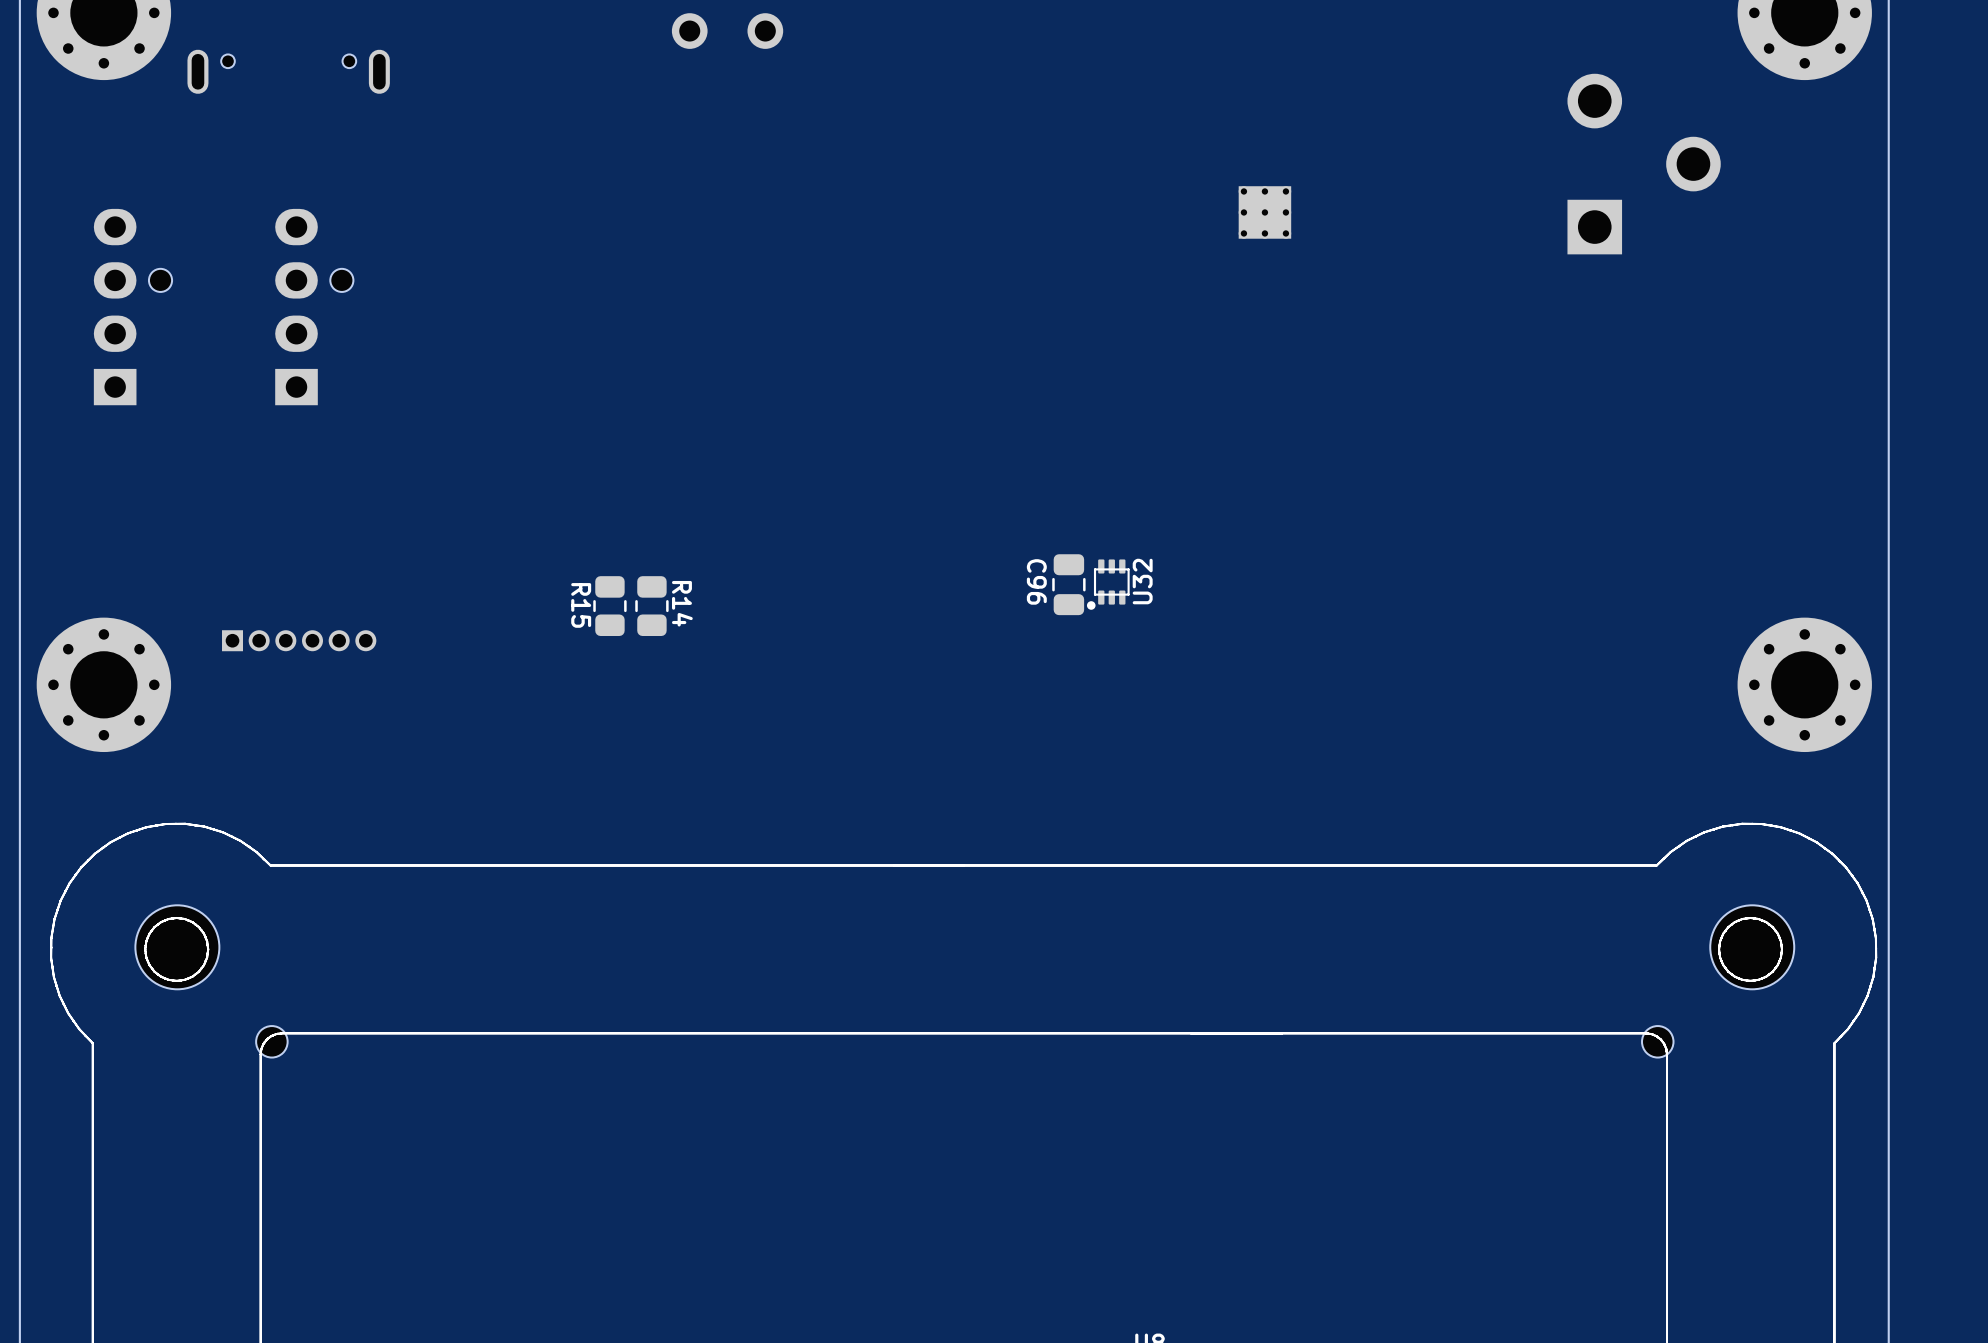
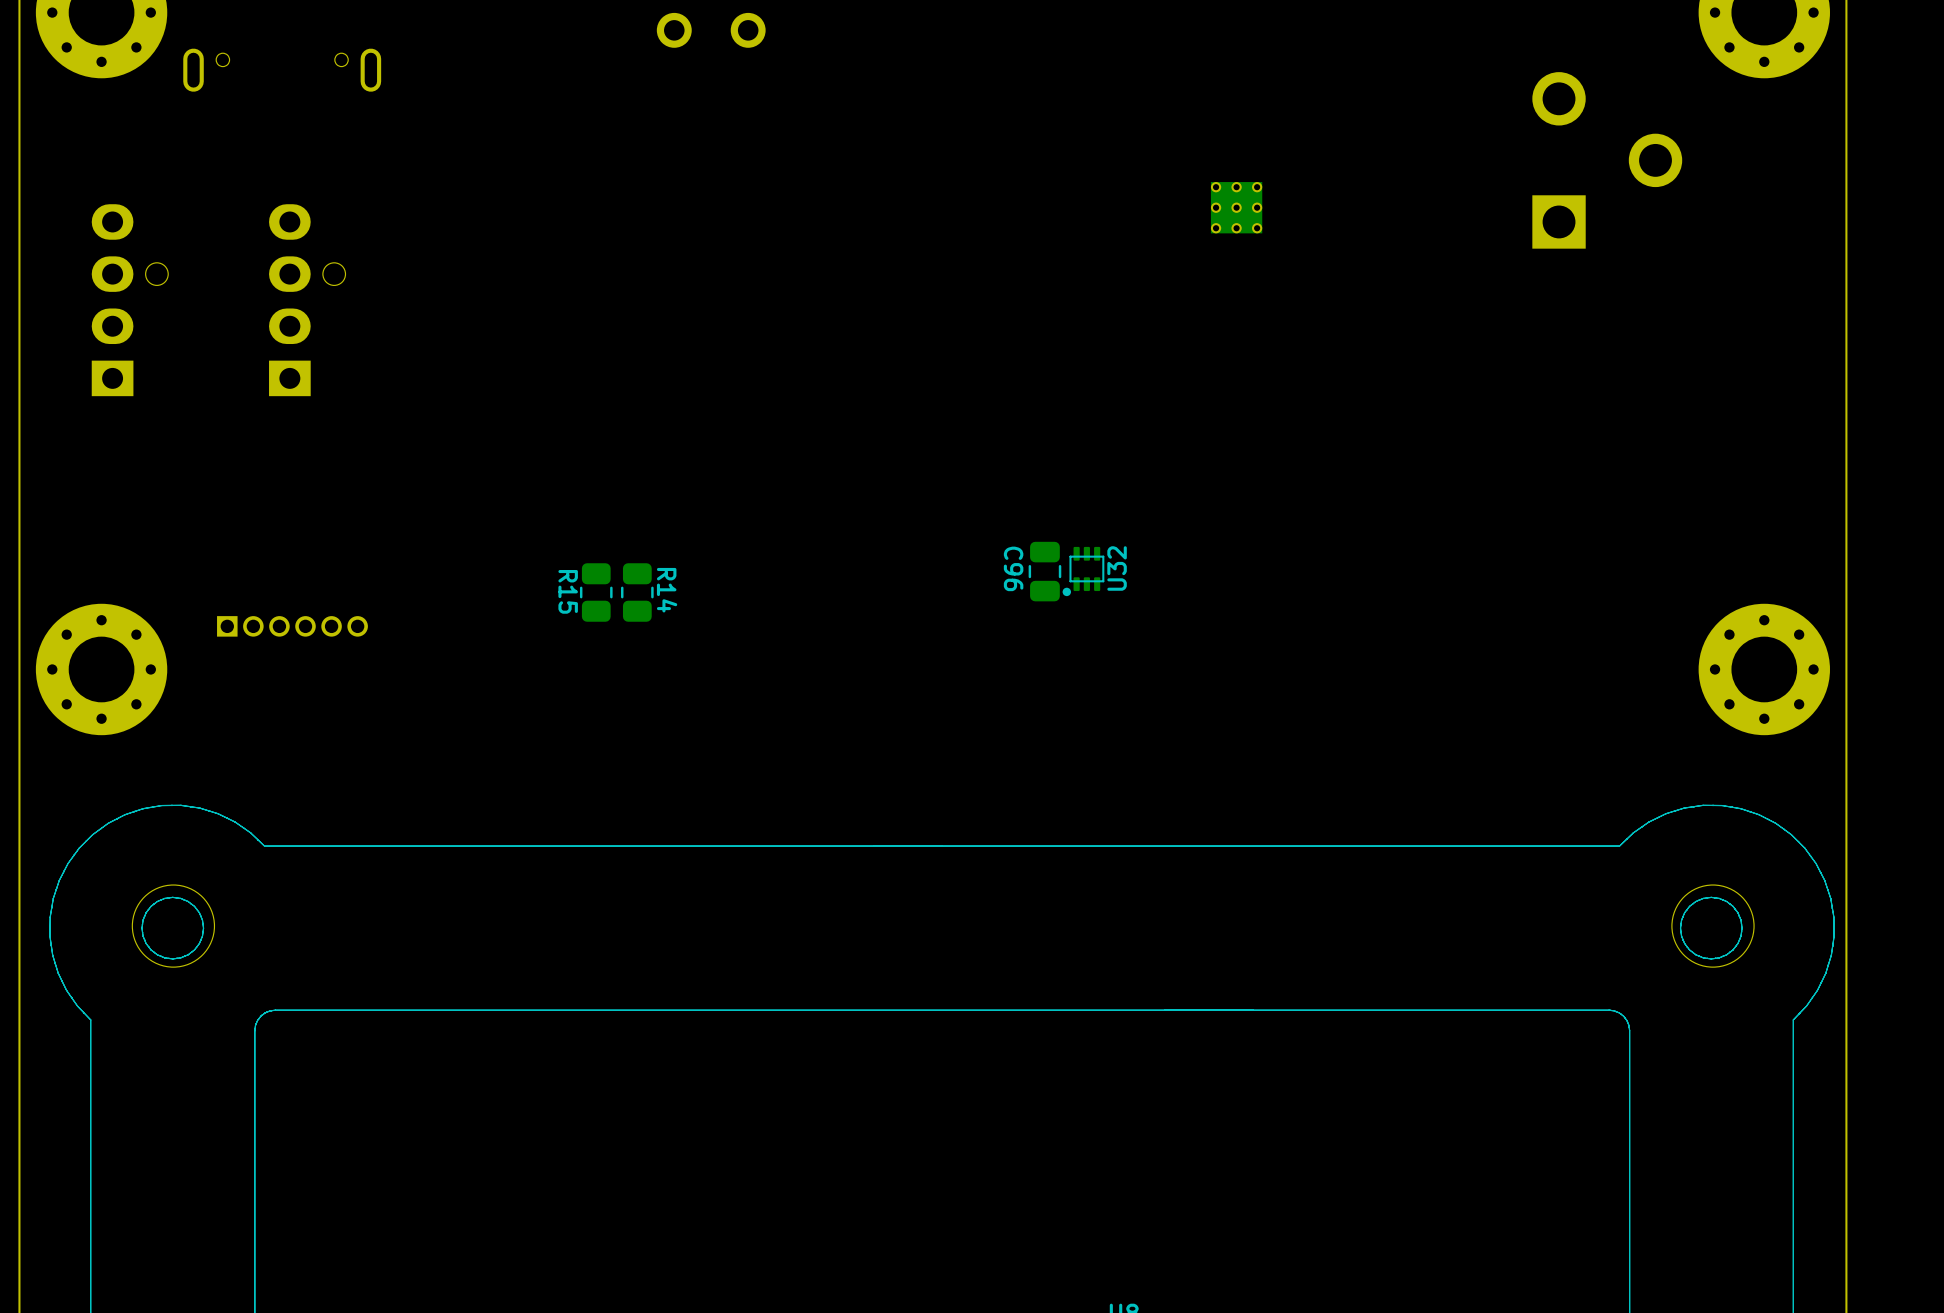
part: (271, 1041) -> none
part: (1657, 1041) -> none

